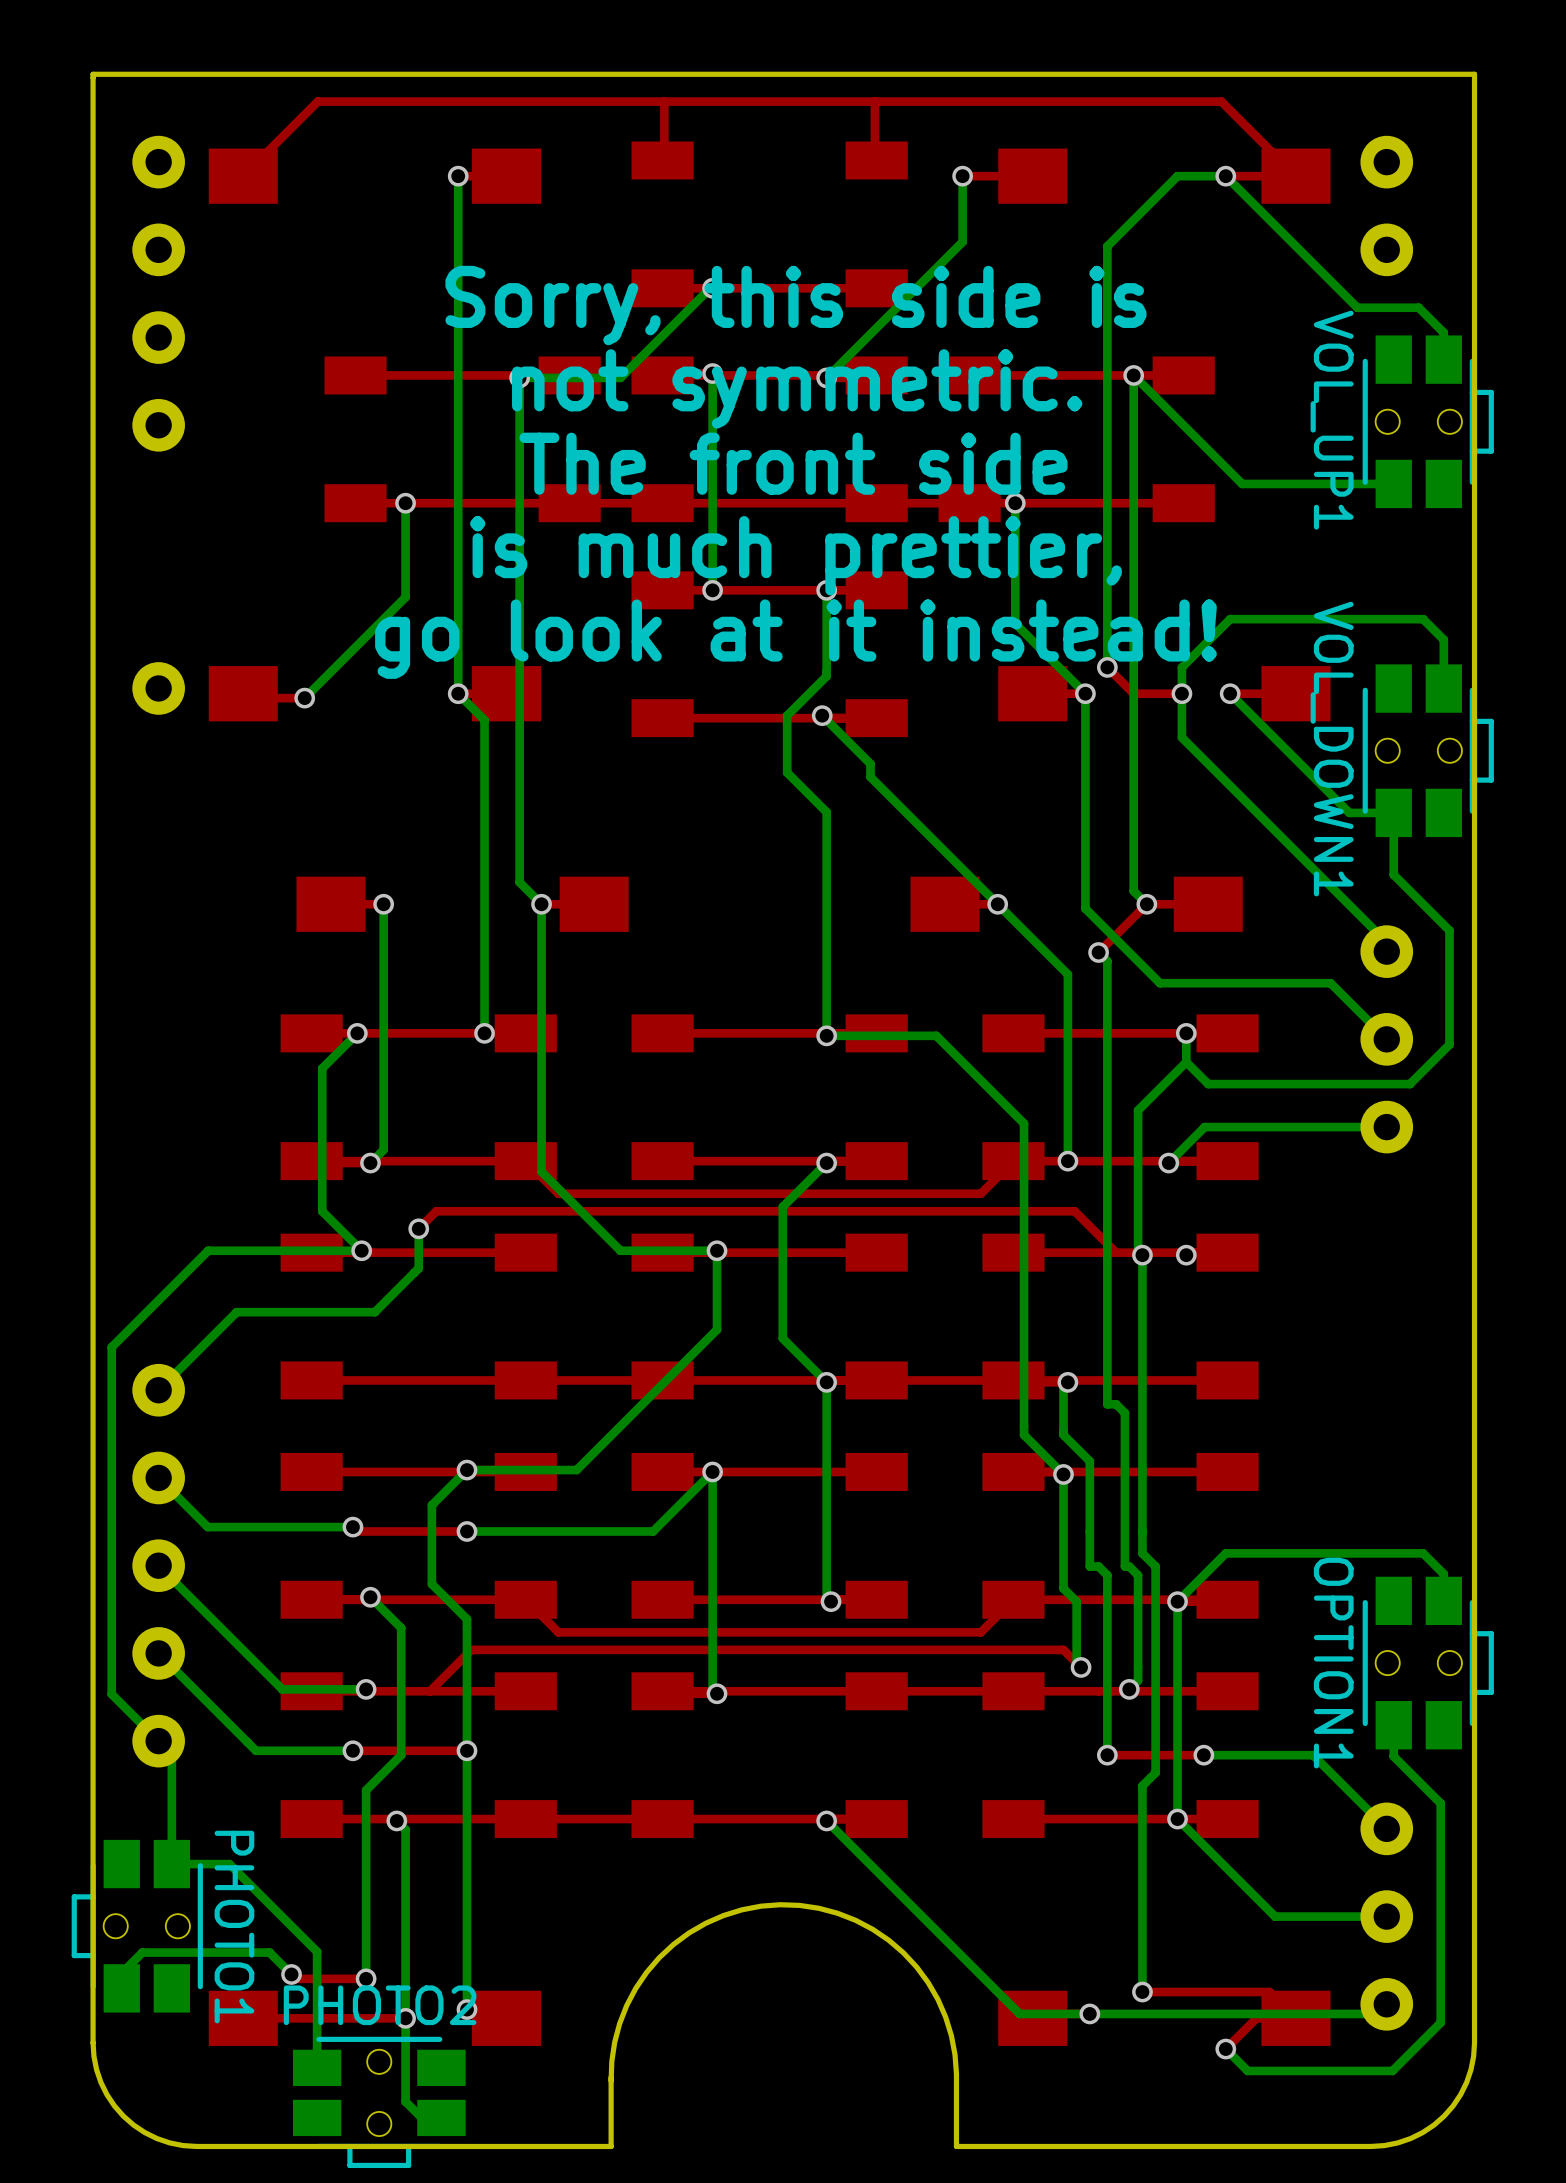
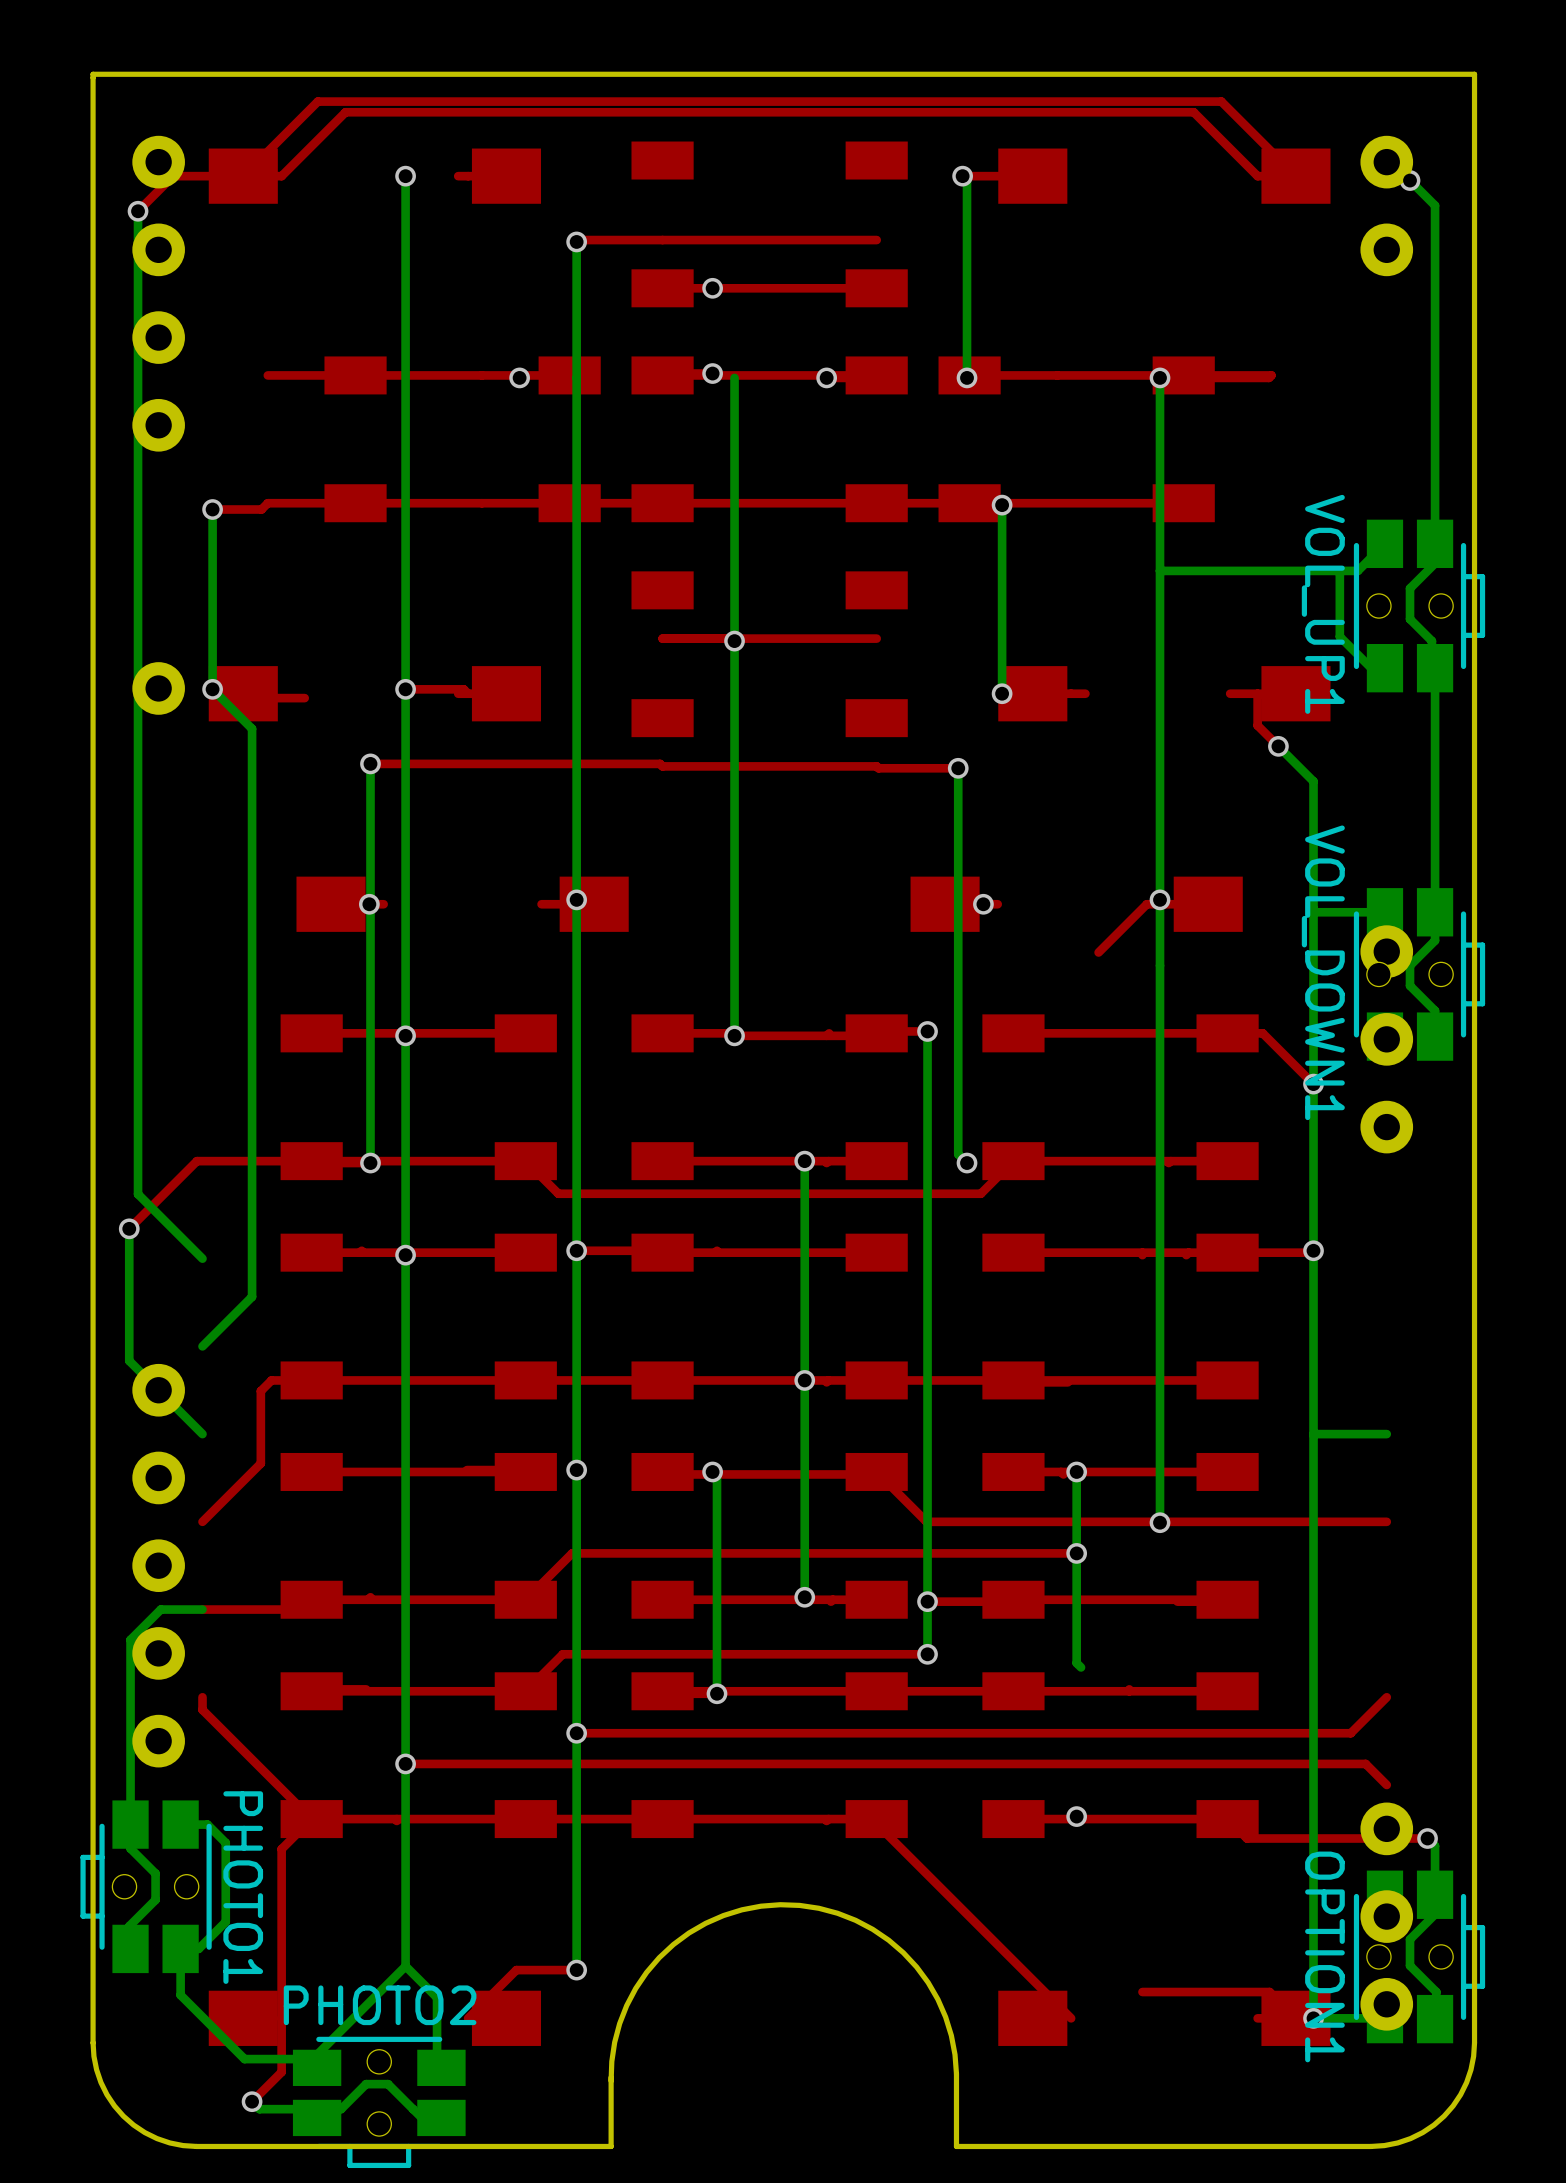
top track: (664, 101) (664, 158) (662, 160) -> none
top track: (874, 101) (874, 158) (876, 160) -> none
bottom track: none -> (405, 176) (405, 503)
bottom track: (458, 176) (458, 693) (484, 720) (484, 1033) -> none
via position: (458, 176) -> (405, 176)
bottom track: (962, 176) (962, 241) (826, 377) -> none
bottom track: none -> (967, 176) (967, 377)
via: (1225, 176) -> none
top track: (1257, 176) (1225, 176) -> (1257, 176) (1193, 112) (345, 112) (281, 176) (173, 176) (138, 211)
bottom track: none -> (1410, 180) (1435, 205) (1435, 563) (1410, 588) (1410, 619) (1431, 641) (1431, 665) (1435, 668) (1435, 940) (1410, 965) (1410, 985) (1435, 1010) (1435, 1036)
via: none -> (1410, 180)
bottom track: none -> (138, 211) (138, 1194) (202, 1258)
via: none -> (138, 211)
top track: none -> (876, 240) (578, 240) (576, 241)
bottom track: none -> (576, 241) (576, 1970)
via: none -> (576, 241)
bottom track: (712, 288) (710, 288) (620, 377) (519, 377) (519, 882) (541, 904) (541, 1171) (620, 1250) (717, 1250) (717, 1329) (576, 1470) (466, 1470) (431, 1505) (431, 1584) (466, 1619) (466, 2009) -> none
text: Sorry, this side is (795, 305) -> none
bottom track: (1443, 359) (1443, 332) (1418, 307) (1357, 307) (1225, 176) (1177, 176) (1107, 246) (1107, 667) -> none
bottom track: (712, 373) (712, 590) -> none
top track: none -> (355, 375) (267, 375)
via position: (1133, 375) -> (1160, 377)
top track: none -> (1183, 375) (1271, 375) (1268, 377) (1173, 377)
bottom track: none -> (734, 377) (734, 1035)
via: none -> (967, 377)
bottom track: none -> (1160, 377) (1160, 1522)
text: not symmetric. (797, 388) -> none
VOL_UP1 position: (1428, 421) -> (1419, 606)
text: The front side (793, 463) -> none
bottom track: (1393, 483) (1242, 483) (1133, 375) (1133, 891) (1146, 904) -> none
top track: none -> (355, 503) (267, 503) (261, 509) (212, 509)
via: (405, 503) -> none
bottom track: (1015, 503) (1015, 623) (1085, 693) (1085, 908) (1160, 983) (1330, 983) (1386, 1039) -> none
via position: (1015, 503) -> (1002, 505)
bottom track: none -> (1002, 505) (1002, 693)
via: none -> (212, 509)
bottom track: none -> (1384, 543) (1357, 570) (1160, 570)
text: is much prettier, (795, 555) -> none
bottom track: none -> (1339, 570) (1339, 636) (1371, 668) (1384, 668)
via: (712, 590) -> none
bottom track: (826, 590) (826, 676) (787, 715) (787, 772) (826, 812) (826, 1035) (936, 1035) (1024, 1123) (1024, 1434) (1063, 1474) (1063, 1588) (1076, 1601) -> (1076, 1471) (1076, 1601)
via: (826, 590) -> none
top track: (876, 590) (662, 590) -> (876, 638) (662, 638)
bottom track: (405, 597) (304, 698) -> (405, 597) (405, 1829)
text: go look at it instead! (795, 639) -> none
via: none -> (734, 641)
top track: (1107, 667) (1133, 693) (1181, 693) -> none
via: (1107, 667) -> none
bottom track: (1443, 688) (1443, 639) (1423, 619) (1230, 619) (1181, 667) (1181, 737) (1386, 942) (1386, 951) -> none
via: none -> (212, 689)
top track: none -> (405, 689) (463, 689) (468, 693)
via: none -> (405, 689)
via: (458, 693) -> none
via: none -> (1002, 693)
via: (1085, 693) -> none
via: (1181, 693) -> none
bottom track: (1230, 693) (1349, 812) (1393, 812) (1393, 874) (1449, 930) (1449, 1044) (1410, 1084) (1208, 1084) (1186, 1062) -> none
via: (1230, 693) -> none
top track: none -> (1257, 693) (1257, 725) (1278, 746)
via: (304, 698) -> none
top track: (870, 711) (876, 718) (662, 718) -> none
bottom track: (822, 715) (870, 763) (870, 777) (1067, 974) (1067, 1161) -> none
via: (822, 715) -> none
bottom track: none -> (1278, 746) (1313, 781) (1313, 2018) (1384, 2019)
via: none -> (1278, 746)
VOL_DOWN1 position: (1428, 750) -> (1419, 974)
top track: none -> (370, 763) (660, 763) (662, 766) (958, 768)
via: none -> (370, 763)
bottom track: none -> (958, 768) (958, 1154) (967, 1163)
via: none -> (958, 768)
bottom track: (383, 904) (383, 1149) (370, 1163) -> (370, 763) (370, 1163)
via position: (383, 904) -> (369, 904)
via position: (541, 904) -> (576, 899)
via position: (997, 904) -> (983, 904)
via position: (1146, 904) -> (1160, 899)
bottom track: none -> (1384, 912) (1313, 912)
bottom track: (1098, 952) (1107, 961) (1107, 1404) (1116, 1404) (1124, 1413) (1124, 1566) (1129, 1566) (1138, 1575) (1138, 1680) (1129, 1689) -> none
via: (1098, 952) -> none
bottom track: none -> (927, 1031) (927, 1654)
via: none -> (927, 1031)
bottom track: (357, 1033) (322, 1068) (322, 1211) (361, 1250) (208, 1250) (111, 1347) (111, 1694) (171, 1754) (171, 1864) (229, 1864) (317, 1951) (317, 2067) -> none
via: (357, 1033) -> none
via: (484, 1033) -> none
top track: (876, 1033) (732, 1033) -> (927, 1031) (878, 1031) (874, 1035) (734, 1035) (732, 1033)
bottom track: (1186, 1033) (1186, 1062) -> none
via: (1186, 1033) -> none
top track: none -> (1227, 1033) (1262, 1033) (1313, 1084)
via: none -> (405, 1035)
via: none -> (734, 1035)
via: (826, 1035) -> none
bottom track: (1186, 1062) (1138, 1110) (1138, 1250) (1142, 1255) (1142, 1553) (1155, 1566) (1155, 1772) (1142, 1785) (1142, 1992) -> none
via: none -> (1313, 1084)
bottom track: (1386, 1127) (1204, 1127) (1168, 1163) -> none
top track: none -> (311, 1161) (196, 1161) (129, 1228)
bottom track: none -> (804, 1161) (804, 1597)
via: (1067, 1161) -> none
bottom track: (826, 1163) (782, 1206) (782, 1338) (826, 1382) (826, 1597) (831, 1601) -> none
via position: (826, 1163) -> (804, 1161)
via: none -> (967, 1163)
via: (1168, 1163) -> none
bottom track: none -> (129, 1228) (129, 1360) (202, 1434)
via: none -> (129, 1228)
bottom track: (418, 1228) (418, 1268) (374, 1312) (236, 1312) -> (212, 509) (212, 689) (252, 728) (252, 1296) (236, 1312)
top track: (418, 1228) (436, 1211) (1074, 1211) (1116, 1252) -> none
via: (418, 1228) -> none
via: (361, 1250) -> none
top track: none -> (576, 1250) (660, 1250) (662, 1252)
via: none -> (576, 1250)
via: (717, 1250) -> none
top track: none -> (1313, 1250) (1311, 1252) (1227, 1252)
via: none -> (1313, 1250)
via: none -> (405, 1255)
via: (1142, 1255) -> none
via: (1186, 1255) -> none
bottom track: (202, 1346) (158, 1390) -> none
top track: none -> (311, 1380) (271, 1380) (260, 1391) (260, 1463) (202, 1521)
via position: (826, 1382) -> (804, 1380)
bottom track: (1067, 1382) (1063, 1386) (1063, 1434) (1089, 1461) (1089, 1566) (1098, 1566) (1107, 1575) (1107, 1755) -> none
via: (1067, 1382) -> none
bottom track: none -> (1386, 1434) (1313, 1434)
via: (466, 1470) -> none
via: none -> (576, 1470)
top track: (876, 1471) (662, 1471) -> (1386, 1521) (926, 1521) (876, 1471) (874, 1474) (665, 1474) (662, 1471)
via position: (1063, 1474) -> (1076, 1471)
bottom track: (158, 1477) (207, 1527) (352, 1527) -> none
via: none -> (1160, 1522)
top track: (352, 1527) (357, 1531) (466, 1531) -> none
via: (352, 1527) -> none
bottom track: (466, 1531) (653, 1531) (712, 1471) (712, 1689) (717, 1693) -> (717, 1474) (717, 1693)
via: (466, 1531) -> none
via: none -> (1076, 1553)
bottom track: (158, 1565) (282, 1689) (366, 1689) -> none
bottom track: (370, 1597) (401, 1627) (401, 1755) (366, 1790) (366, 1978) -> none
via: (370, 1597) -> none
top track: none -> (311, 1599) (301, 1609) (202, 1609)
top track: (525, 1599) (558, 1632) (980, 1632) (1011, 1601) -> (525, 1599) (572, 1553) (1076, 1553)
bottom track: (1443, 1600) (1443, 1574) (1423, 1553) (1225, 1553) (1177, 1601) (1177, 1819) (1275, 1916) (1386, 1916) -> none
via position: (831, 1601) -> (804, 1597)
via: none -> (927, 1601)
top track: none -> (1011, 1601) (927, 1601)
via: (1177, 1601) -> none
bottom track: none -> (202, 1609) (160, 1609) (130, 1639) (130, 1848) (155, 1873) (155, 1899) (129, 1926) (130, 1948)
bottom track: (158, 1653) (256, 1750) (352, 1750) -> none
top track: none -> (927, 1654) (562, 1654) (525, 1691)
via: none -> (927, 1654)
OPTION1 position: (1428, 1663) -> (1419, 1956)
top track: (1081, 1667) (1063, 1649) (471, 1649) (430, 1691) -> none
via: (1081, 1667) -> none
via: (366, 1689) -> none
via: (1129, 1689) -> none
top track: none -> (202, 1697) (202, 1709) (311, 1819) (281, 1849) (281, 2072) (252, 2101)
top track: none -> (1386, 1697) (1350, 1733) (576, 1733)
bottom track: (1393, 1725) (1393, 1756) (1440, 1803) (1440, 2022) (1392, 2070) (1247, 2070) (1225, 2049) -> none
via: none -> (576, 1733)
via: (352, 1750) -> none
top track: (466, 1750) (352, 1750) -> none
via: (466, 1750) -> none
via: (1107, 1755) -> none
bottom track: (1203, 1755) (1313, 1755) (1386, 1828) -> none
top track: (1203, 1755) (1107, 1755) -> none
via: (1203, 1755) -> none
top track: none -> (405, 1763) (1365, 1763) (1386, 1785)
via: none -> (405, 1763)
via: none -> (1076, 1816)
top track: none -> (876, 1819) (876, 1823) (1071, 2018)
via: (1177, 1819) -> none
top track: none -> (1227, 1819) (1247, 1838) (1427, 1838)
via: (396, 1820) -> none
bottom track: (826, 1820) (1019, 2013) (1377, 2013) (1386, 2004) -> none
via: (826, 1820) -> none
bottom track: none -> (180, 1824) (207, 1824) (225, 1842) (225, 1921) (198, 1948) (180, 1948) (180, 1995) (244, 2059) (312, 2059) (405, 1966) (437, 1997) (437, 2059)
bottom track: none -> (1427, 1838) (1435, 1846) (1435, 1914) (1410, 1939) (1410, 1965) (1436, 1992) (1435, 2019)
via: none -> (1427, 1838)
PHOTO1 position: (137, 1926) -> (146, 1886)
bottom track: (405, 1966) (405, 2101) -> (252, 2101) (259, 2109) (341, 2109) (366, 2084) (388, 2084) (405, 2101)
top track: none -> (576, 1970) (516, 1970) (468, 2018)
via: none -> (576, 1970)
bottom track: (291, 1974) (269, 1952) (142, 1952) (121, 1973) (121, 1988) -> none
top track: (291, 1974) (295, 1978) (366, 1978) -> none
via: (291, 1974) -> none
via: (366, 1978) -> none
via: (1142, 1992) -> none
via: (466, 2009) -> none
via: (1089, 2013) -> none
top track: (405, 2018) (243, 2018) -> none
via: (405, 2018) -> none
top track: (1257, 2018) (1225, 2049) -> none
via: none -> (1313, 2018)
via: (1225, 2049) -> none
via: none -> (252, 2101)

